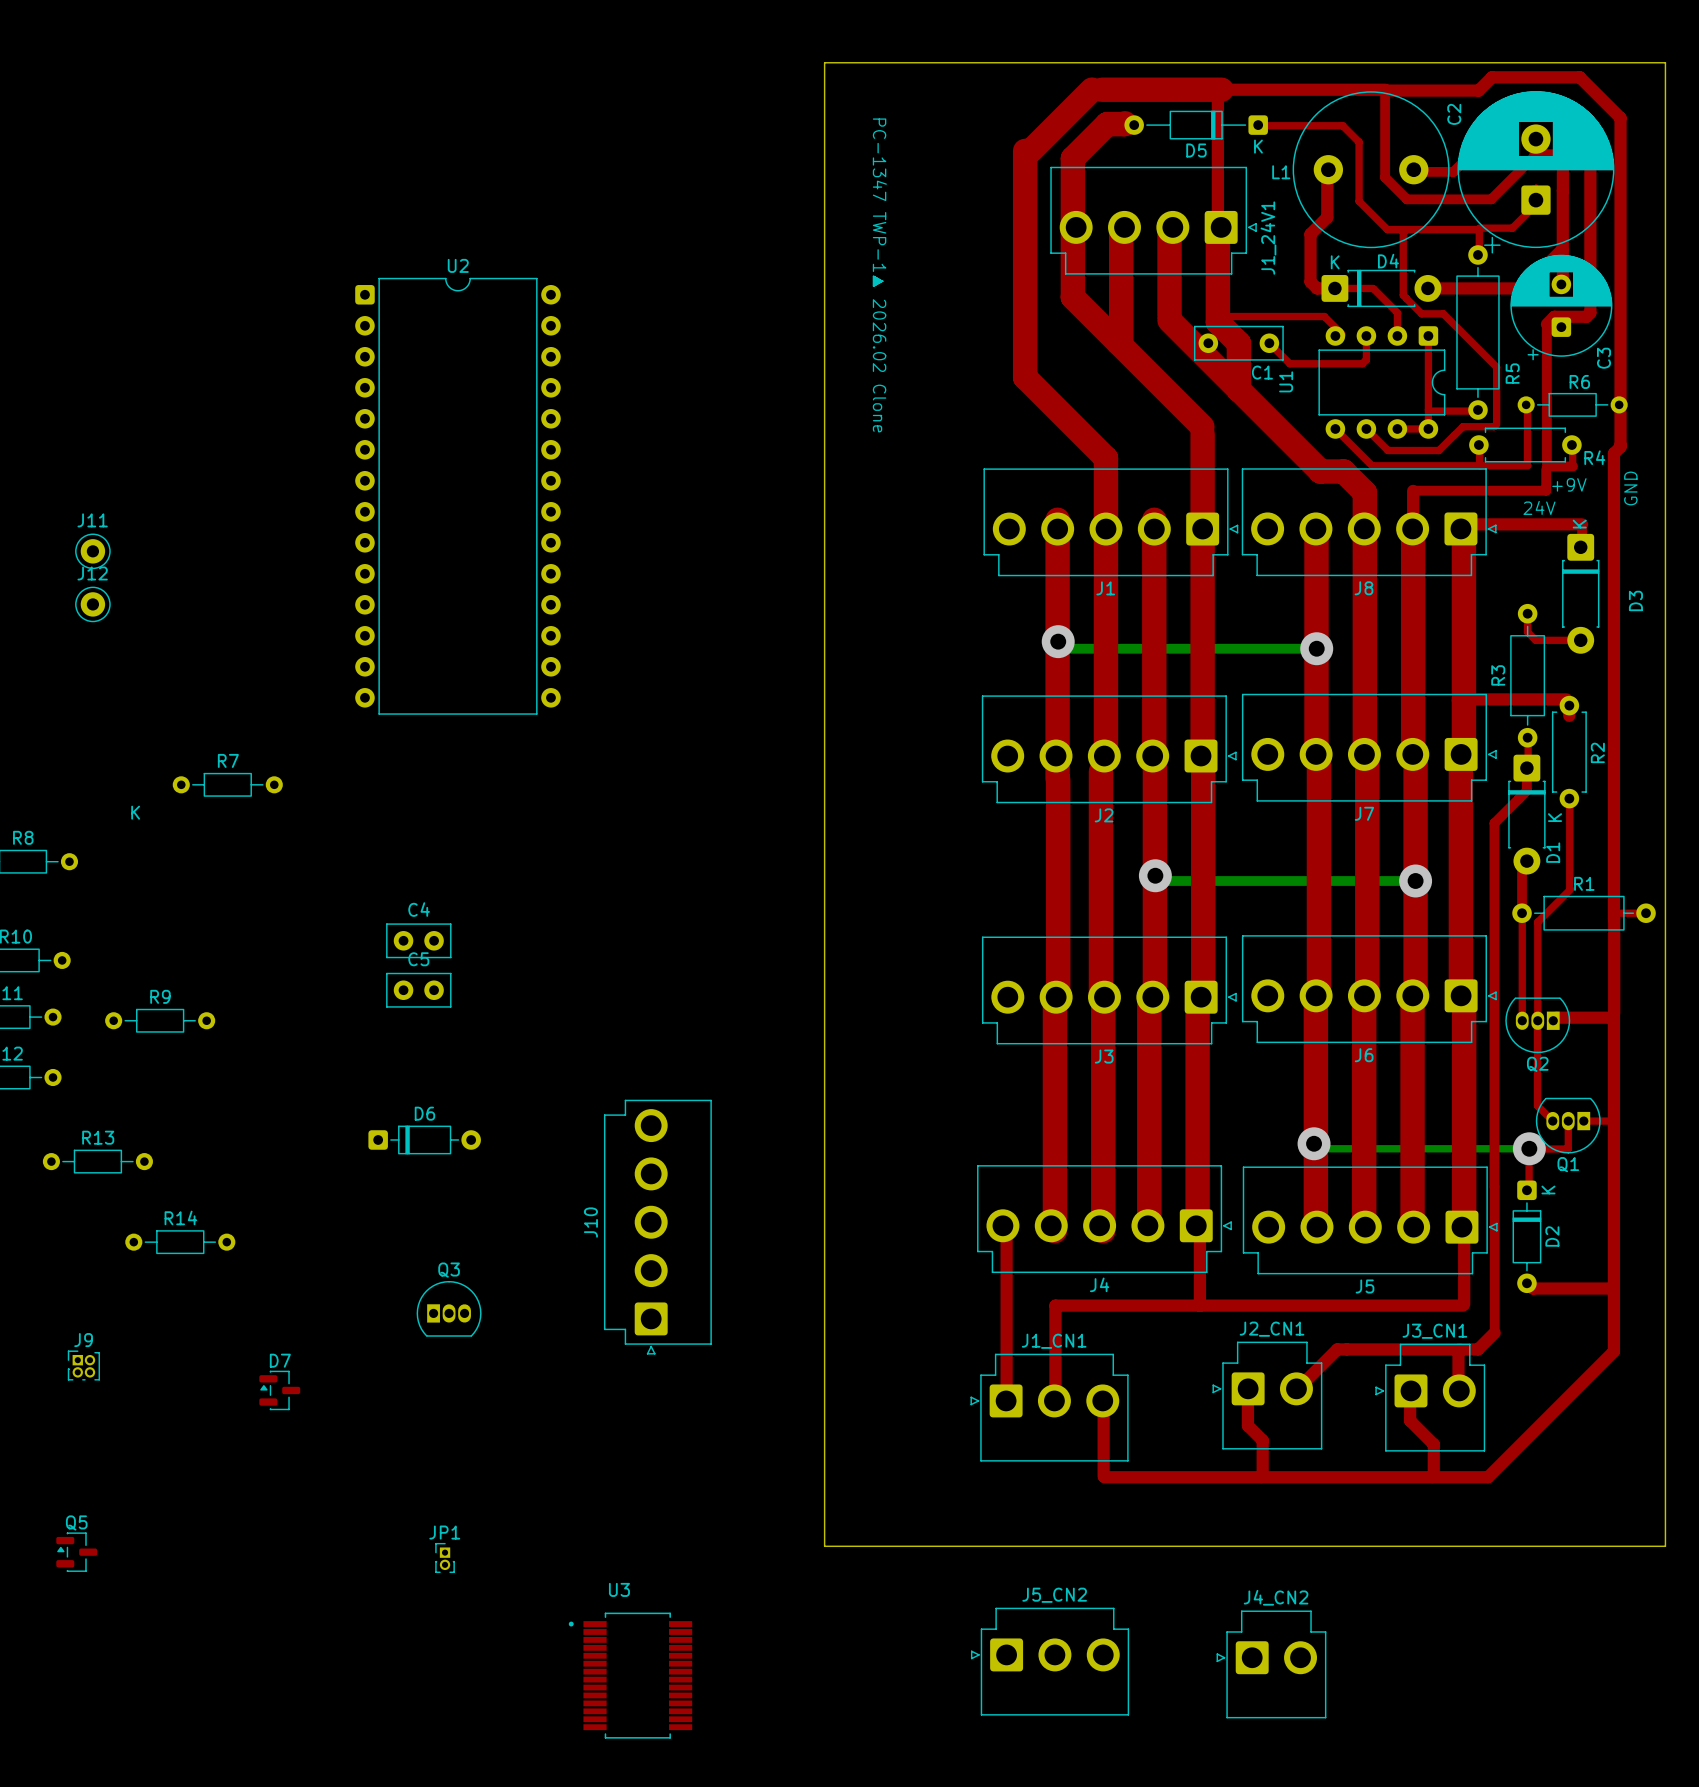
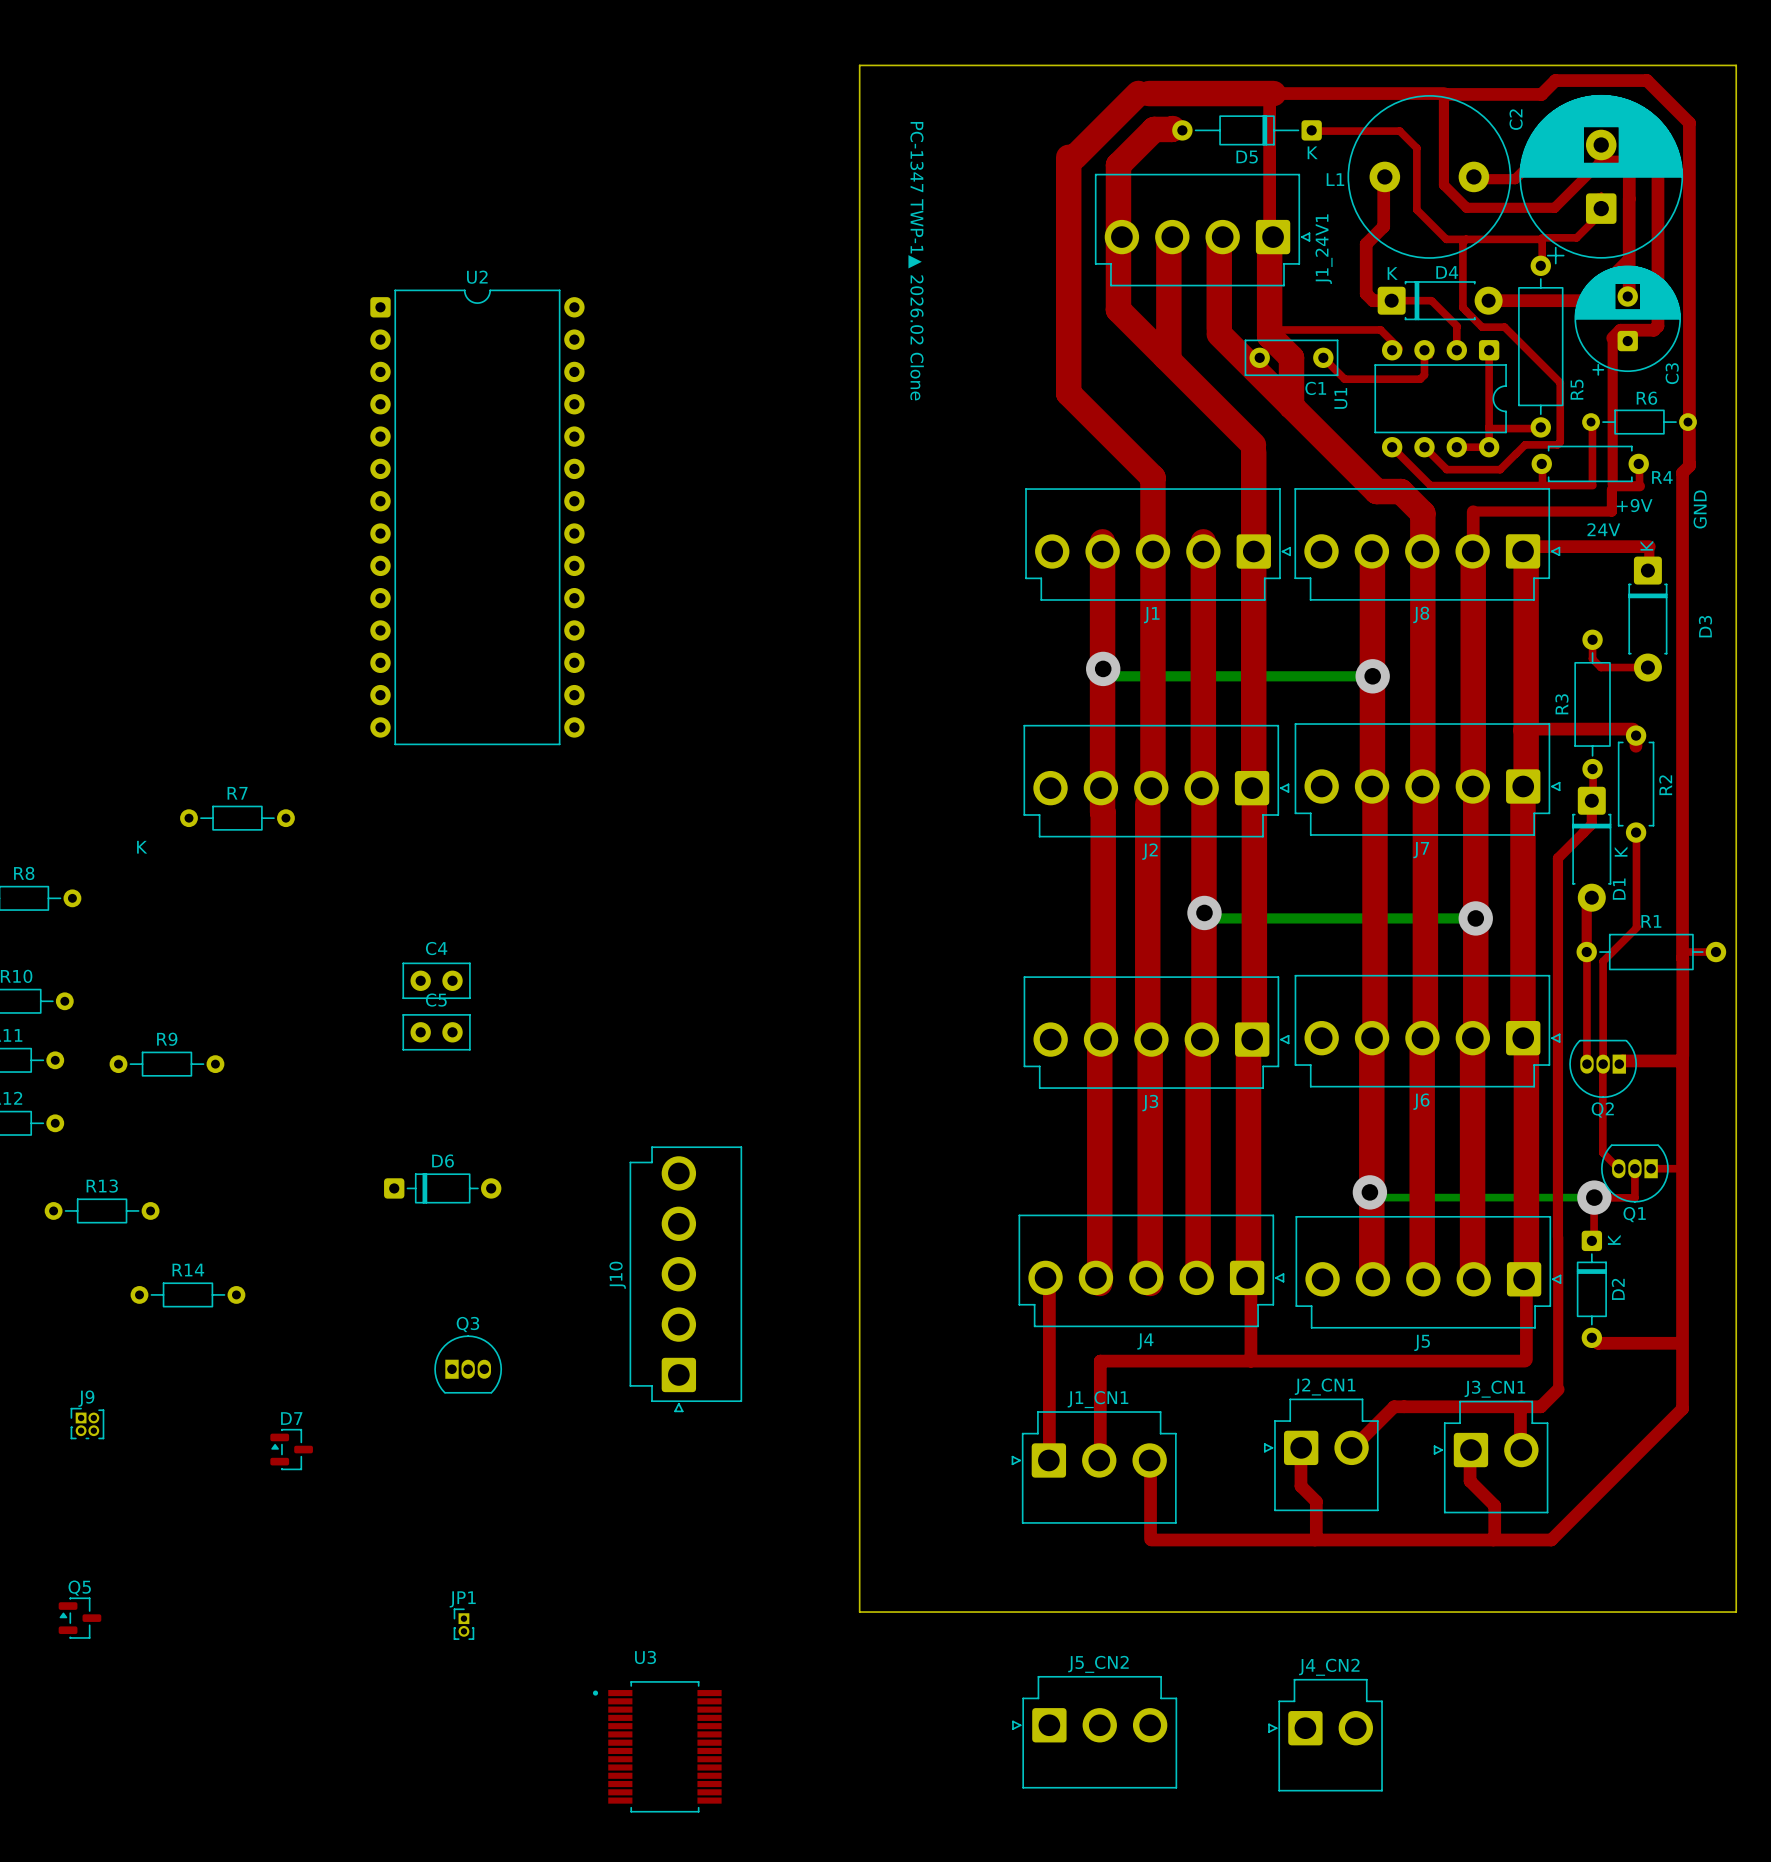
J11: (92, 551) -> none
J12: (92, 604) -> none

